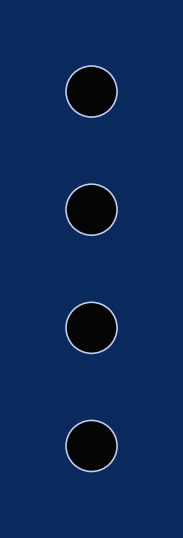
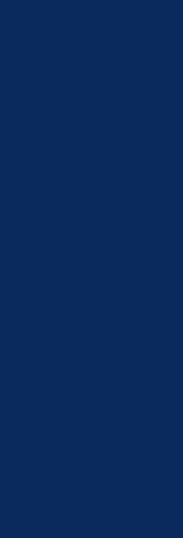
part: (91, 91) -> none
part: (91, 209) -> none
part: (91, 327) -> none
part: (91, 445) -> none

